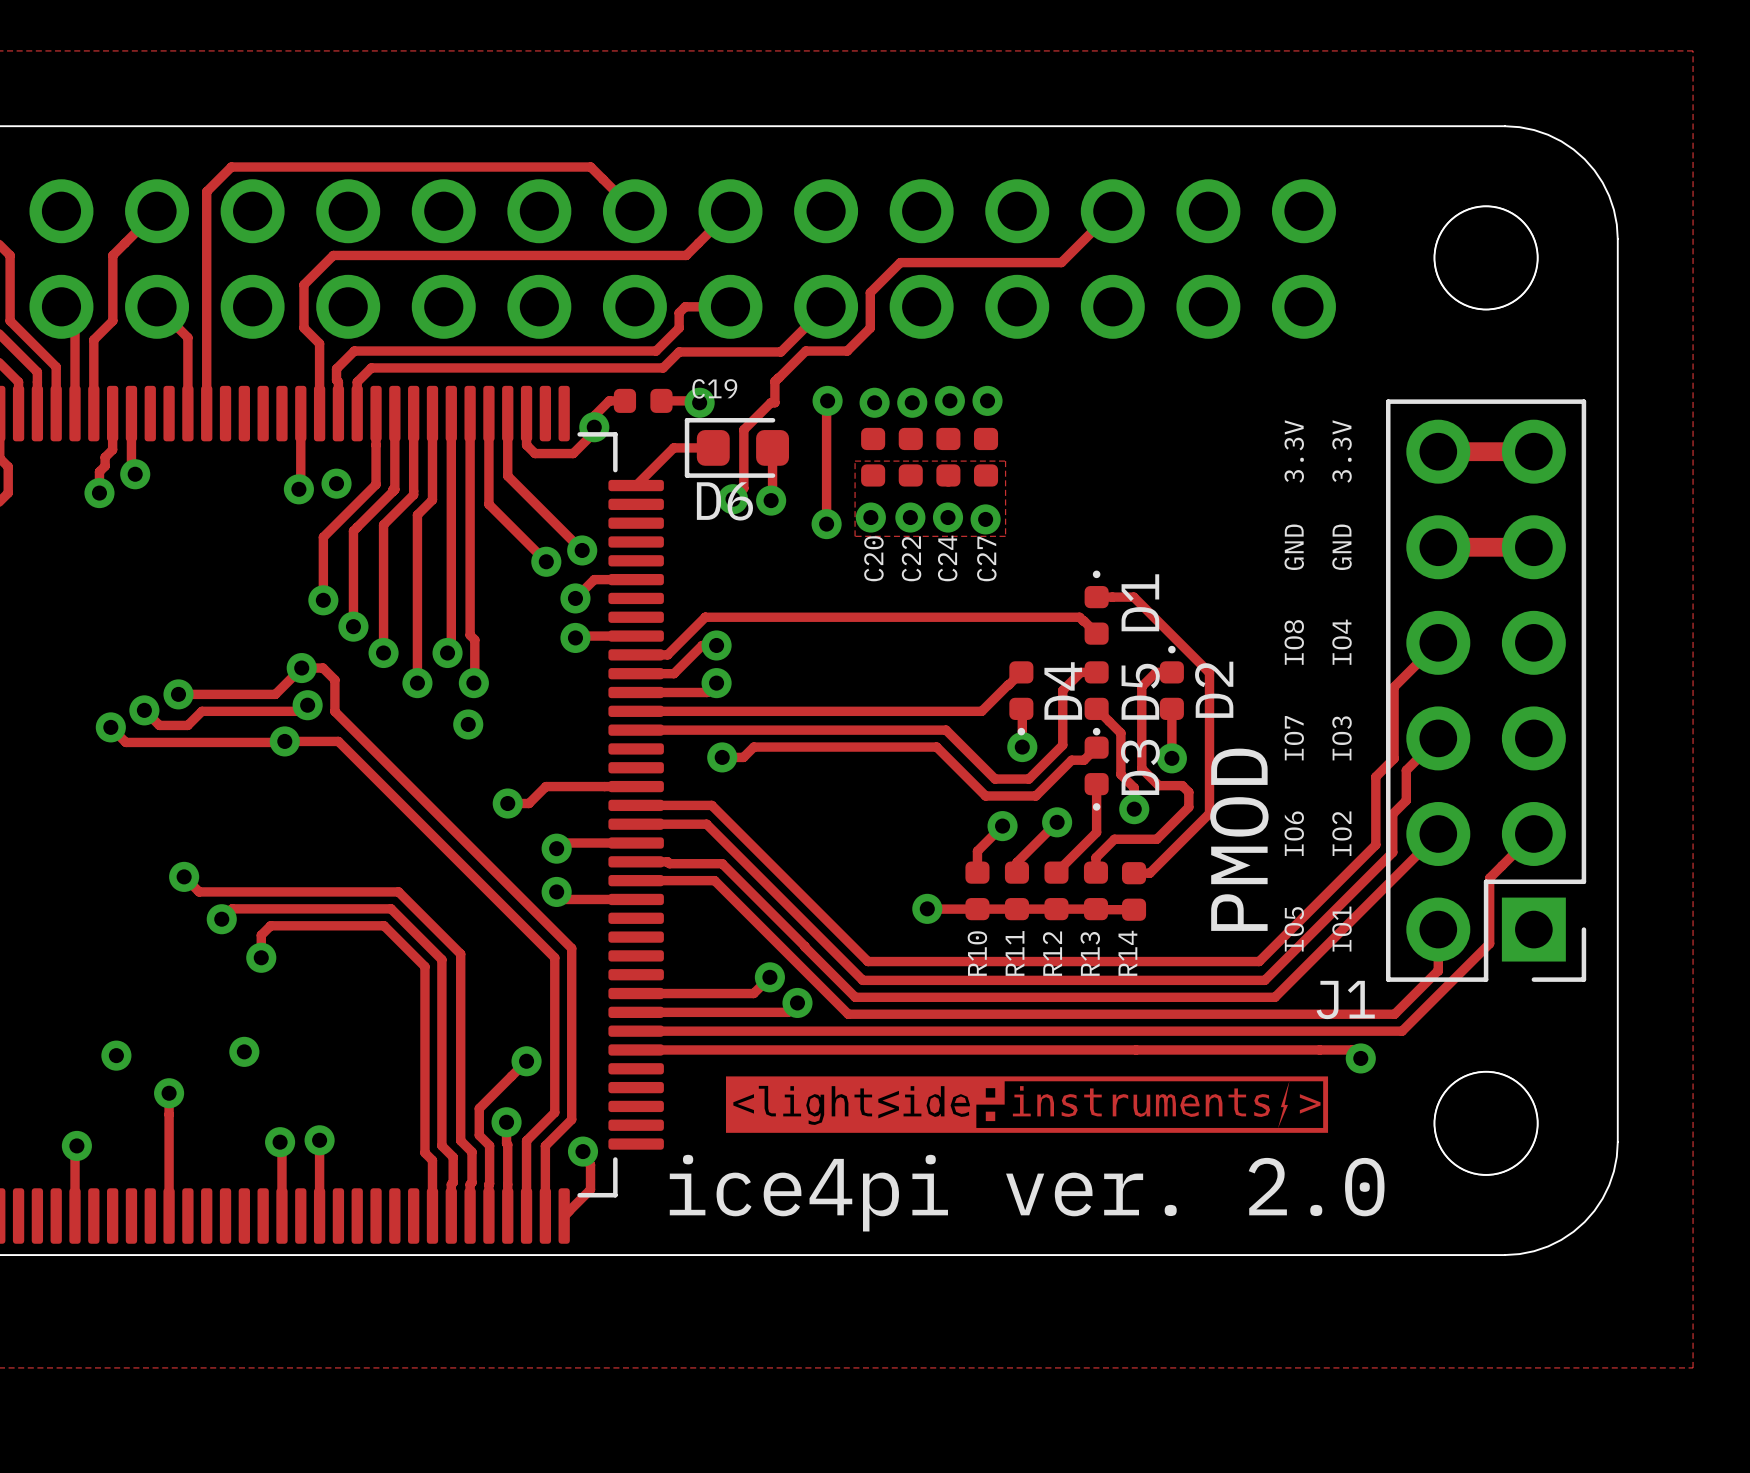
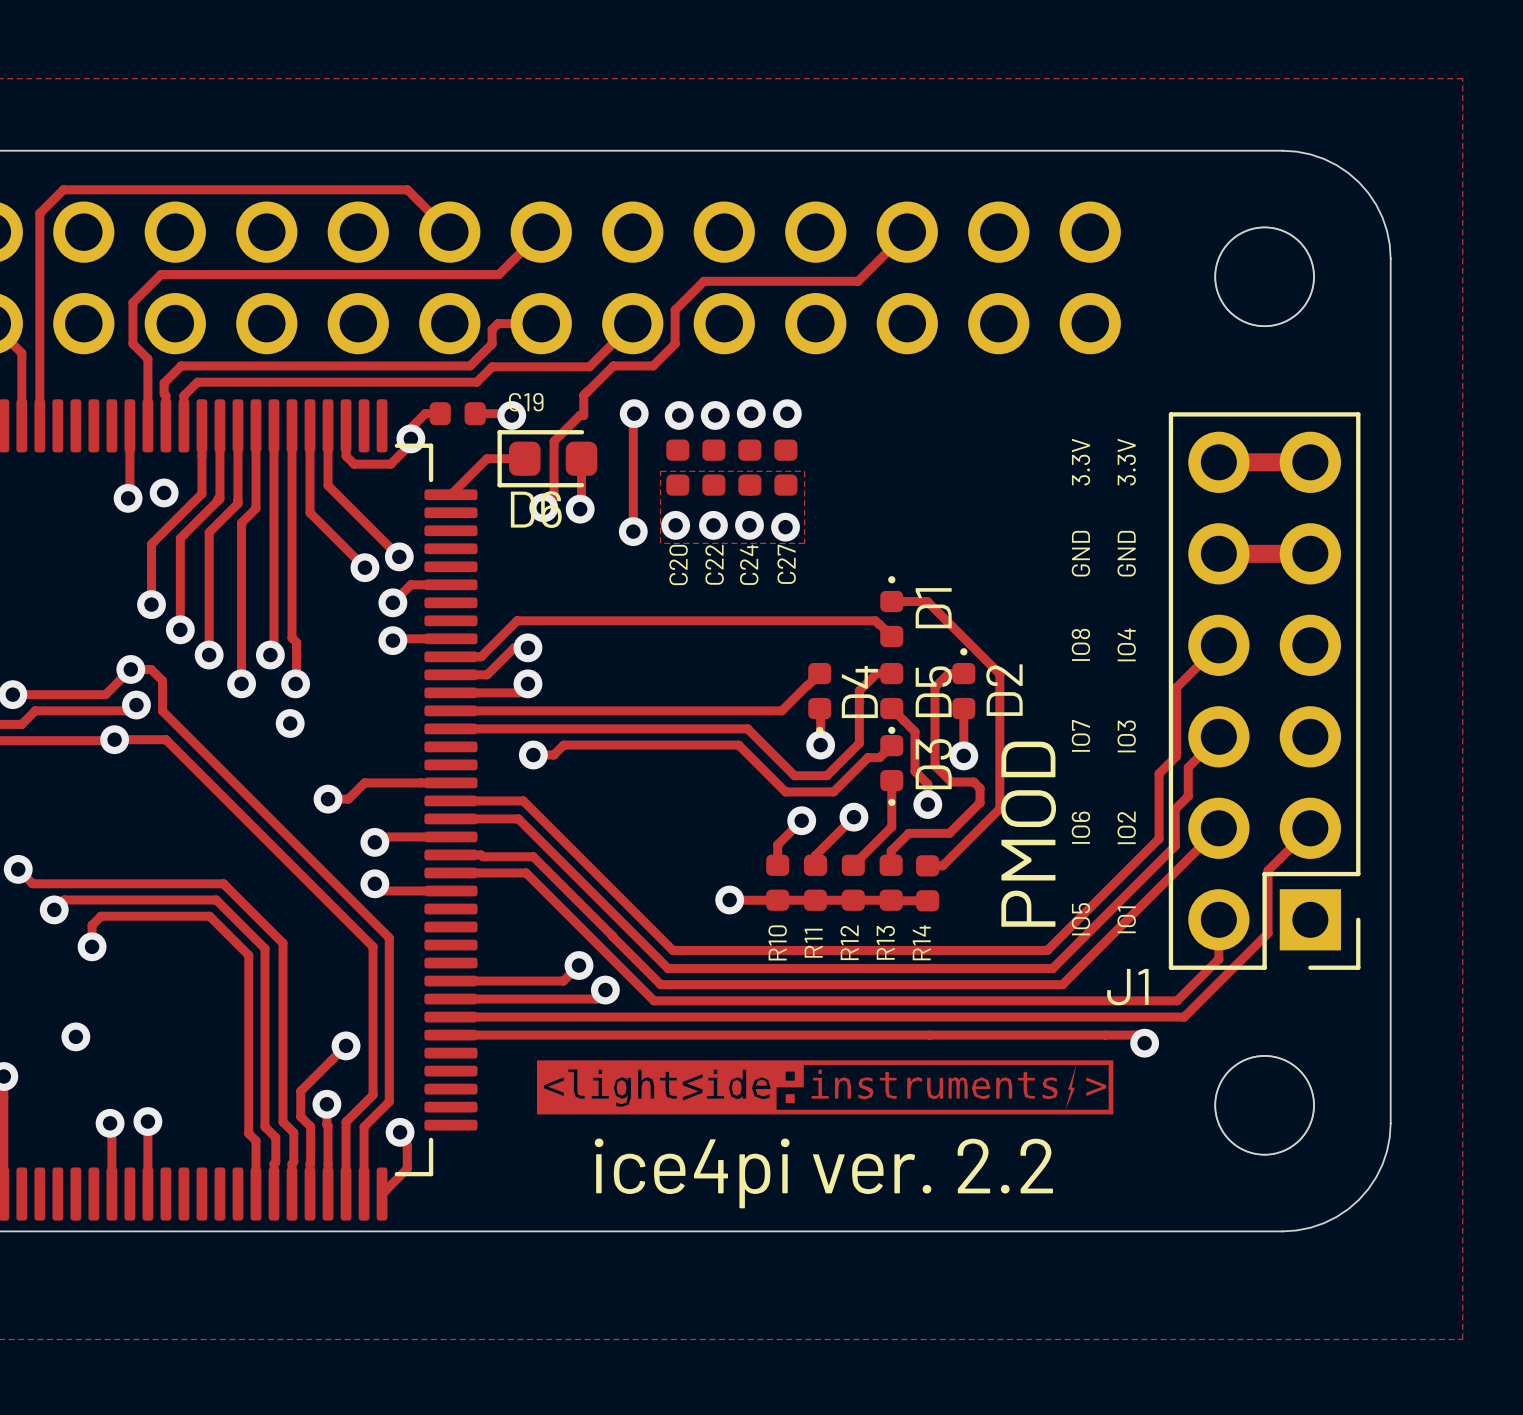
text: ice4pi ver. 2.0 (1027, 1193) -> ice4pi ver. 2.2 (823, 1173)

